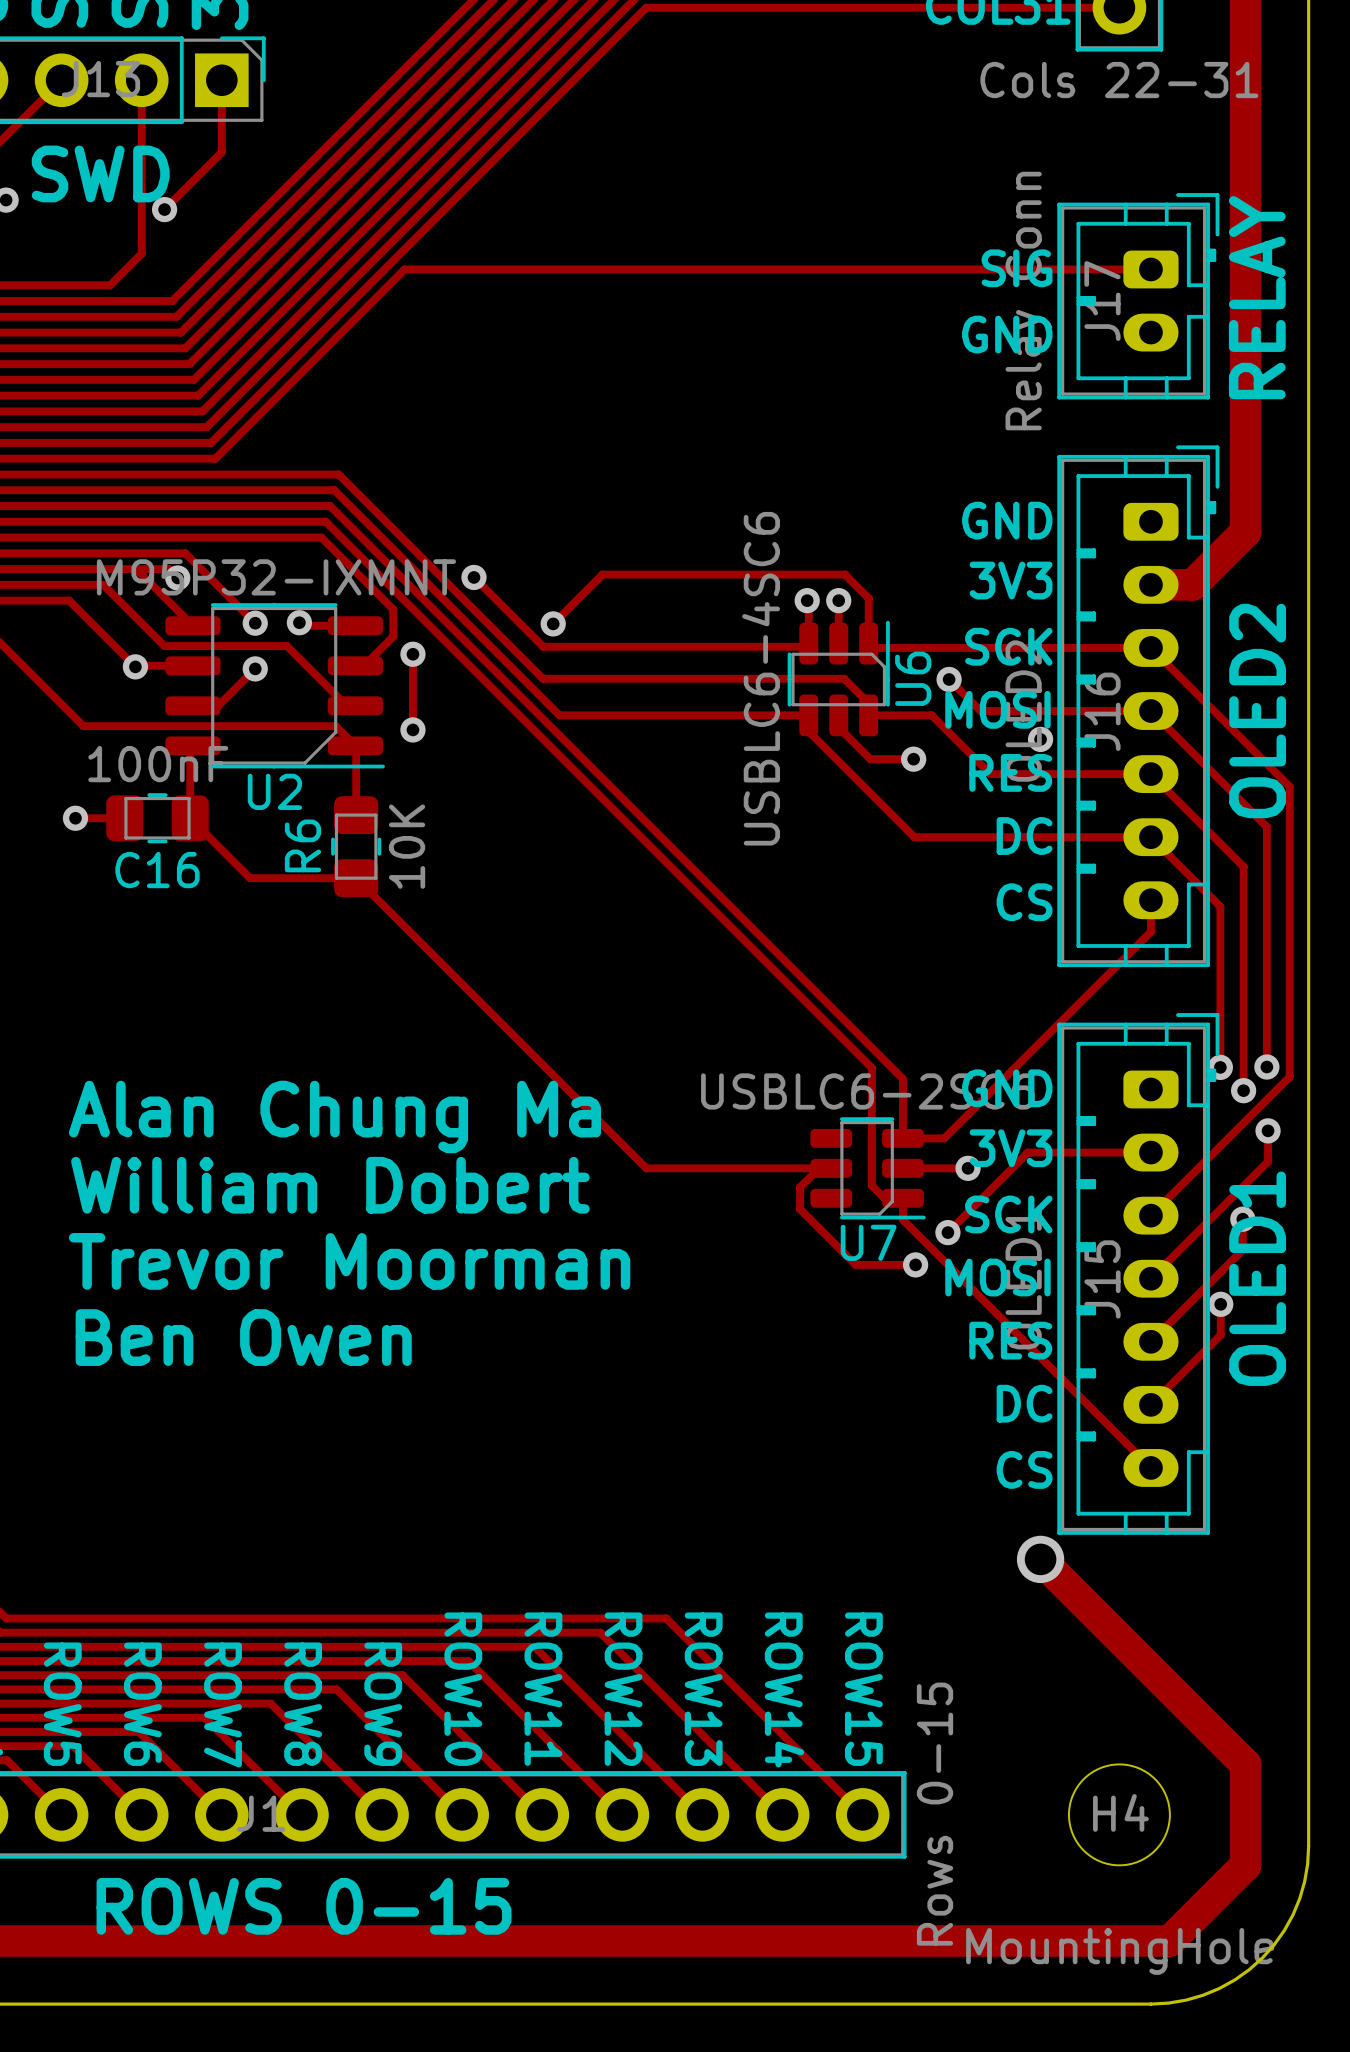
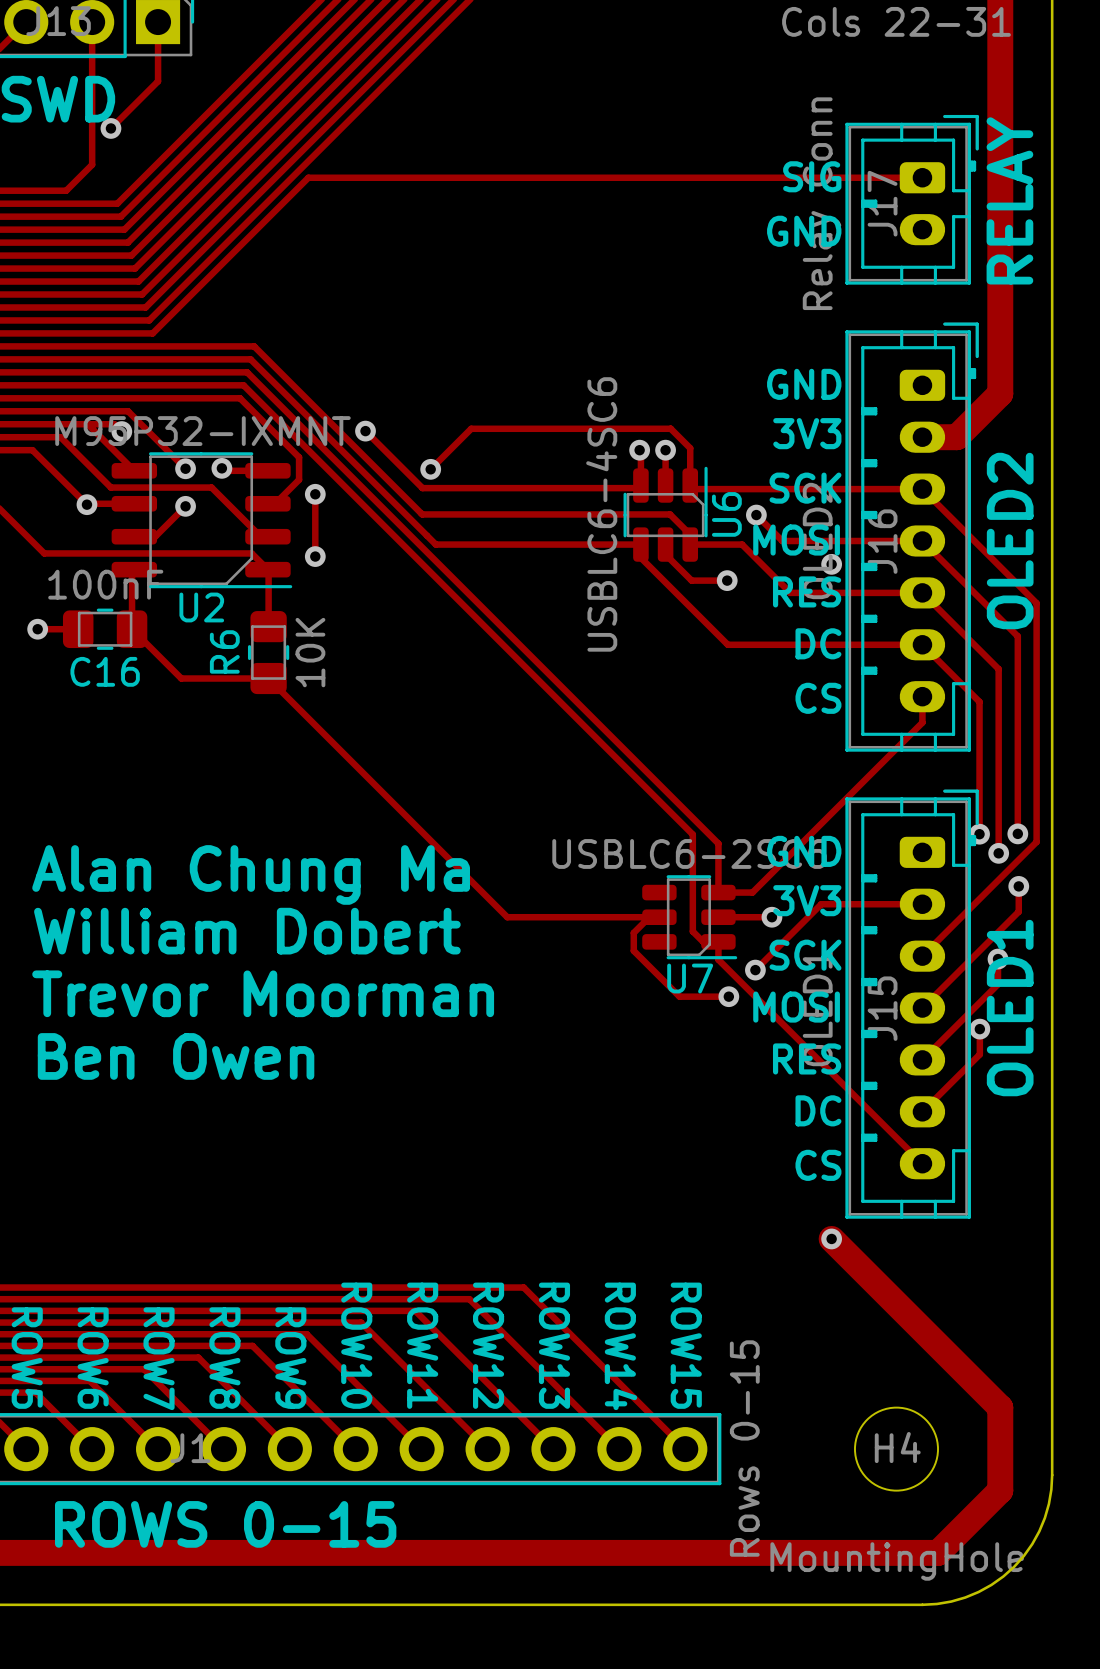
via size: [1016, 1535, 1065, 1584] -> [821, 1228, 843, 1250]

